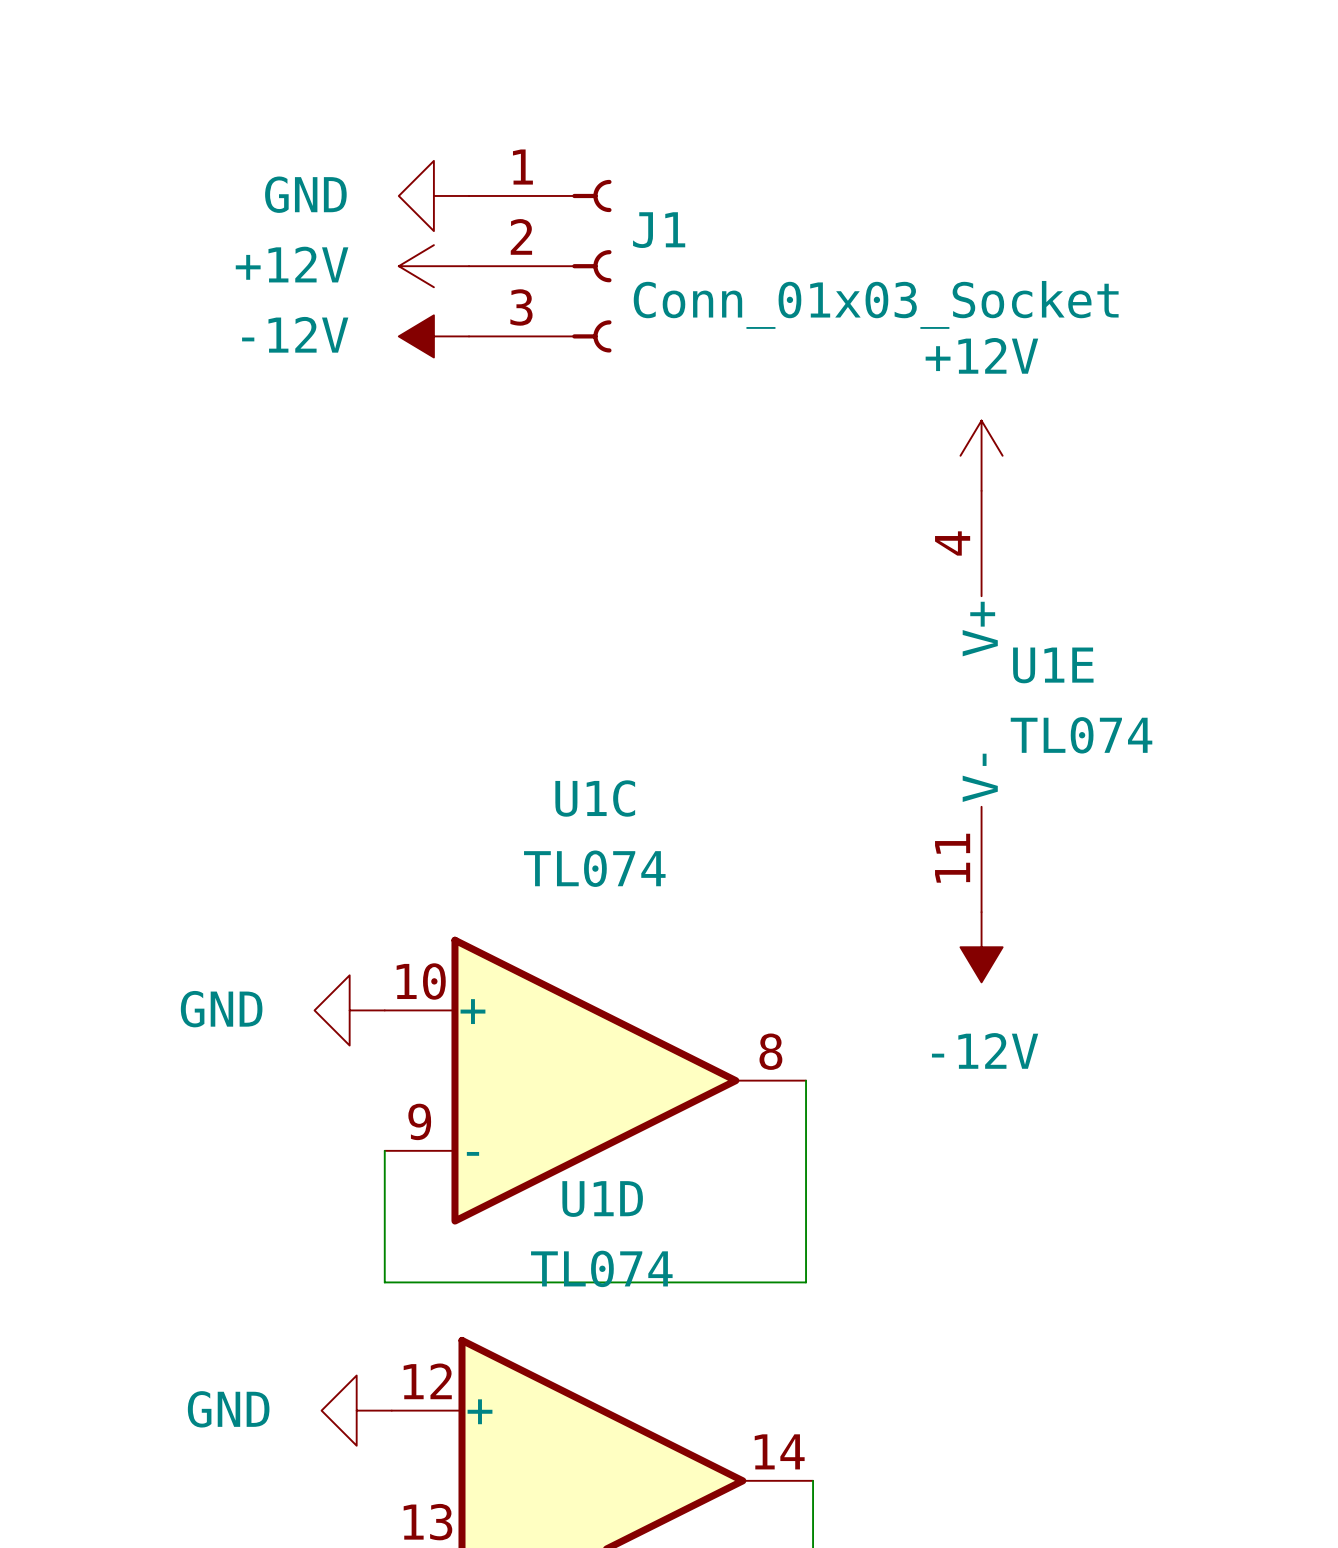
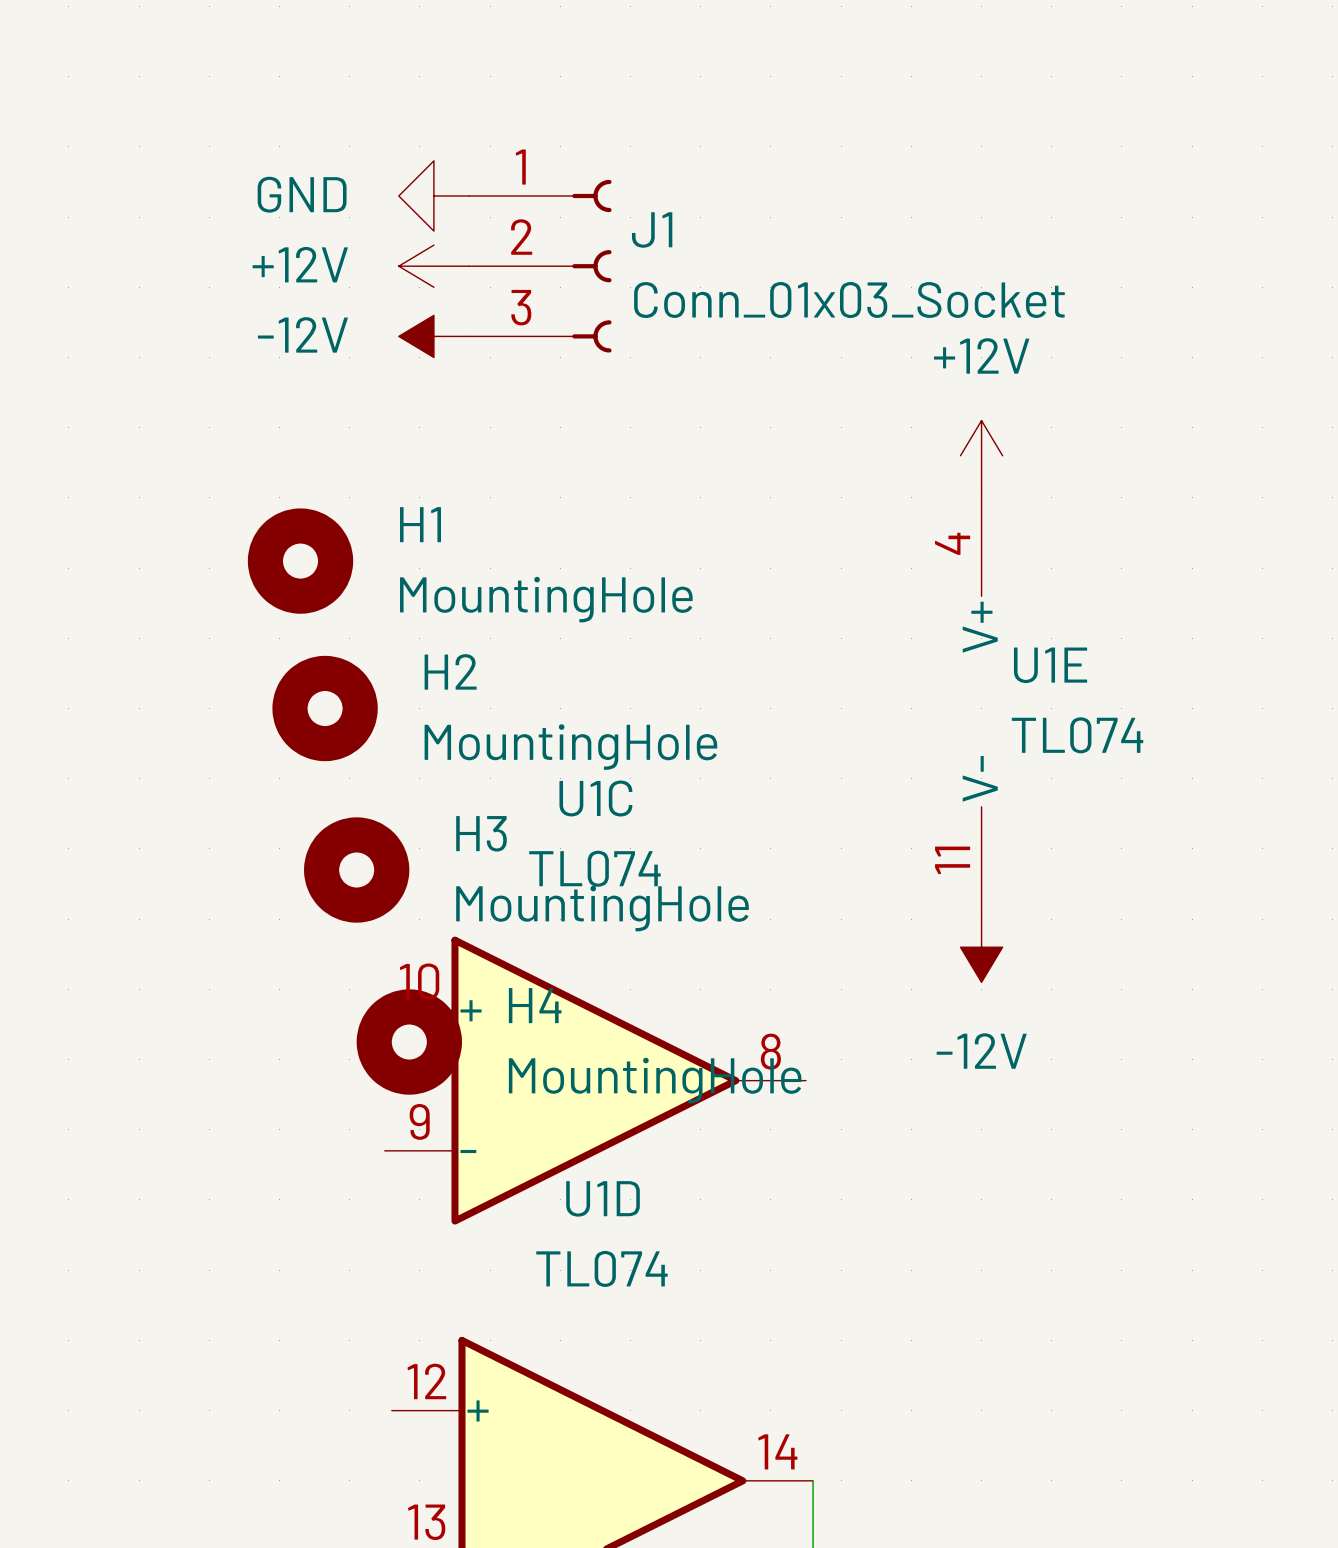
H1: none -> MountingHole (300, 561)
H2: none -> MountingHole (325, 708)
H3: none -> MountingHole (356, 870)
power symbol: GND (349, 1010) -> none
H4: none -> MountingHole (409, 1042)
wire: (806, 1080) (806, 1282) (384, 1282) (384, 1150) -> none
power symbol: GND (356, 1410) -> none

